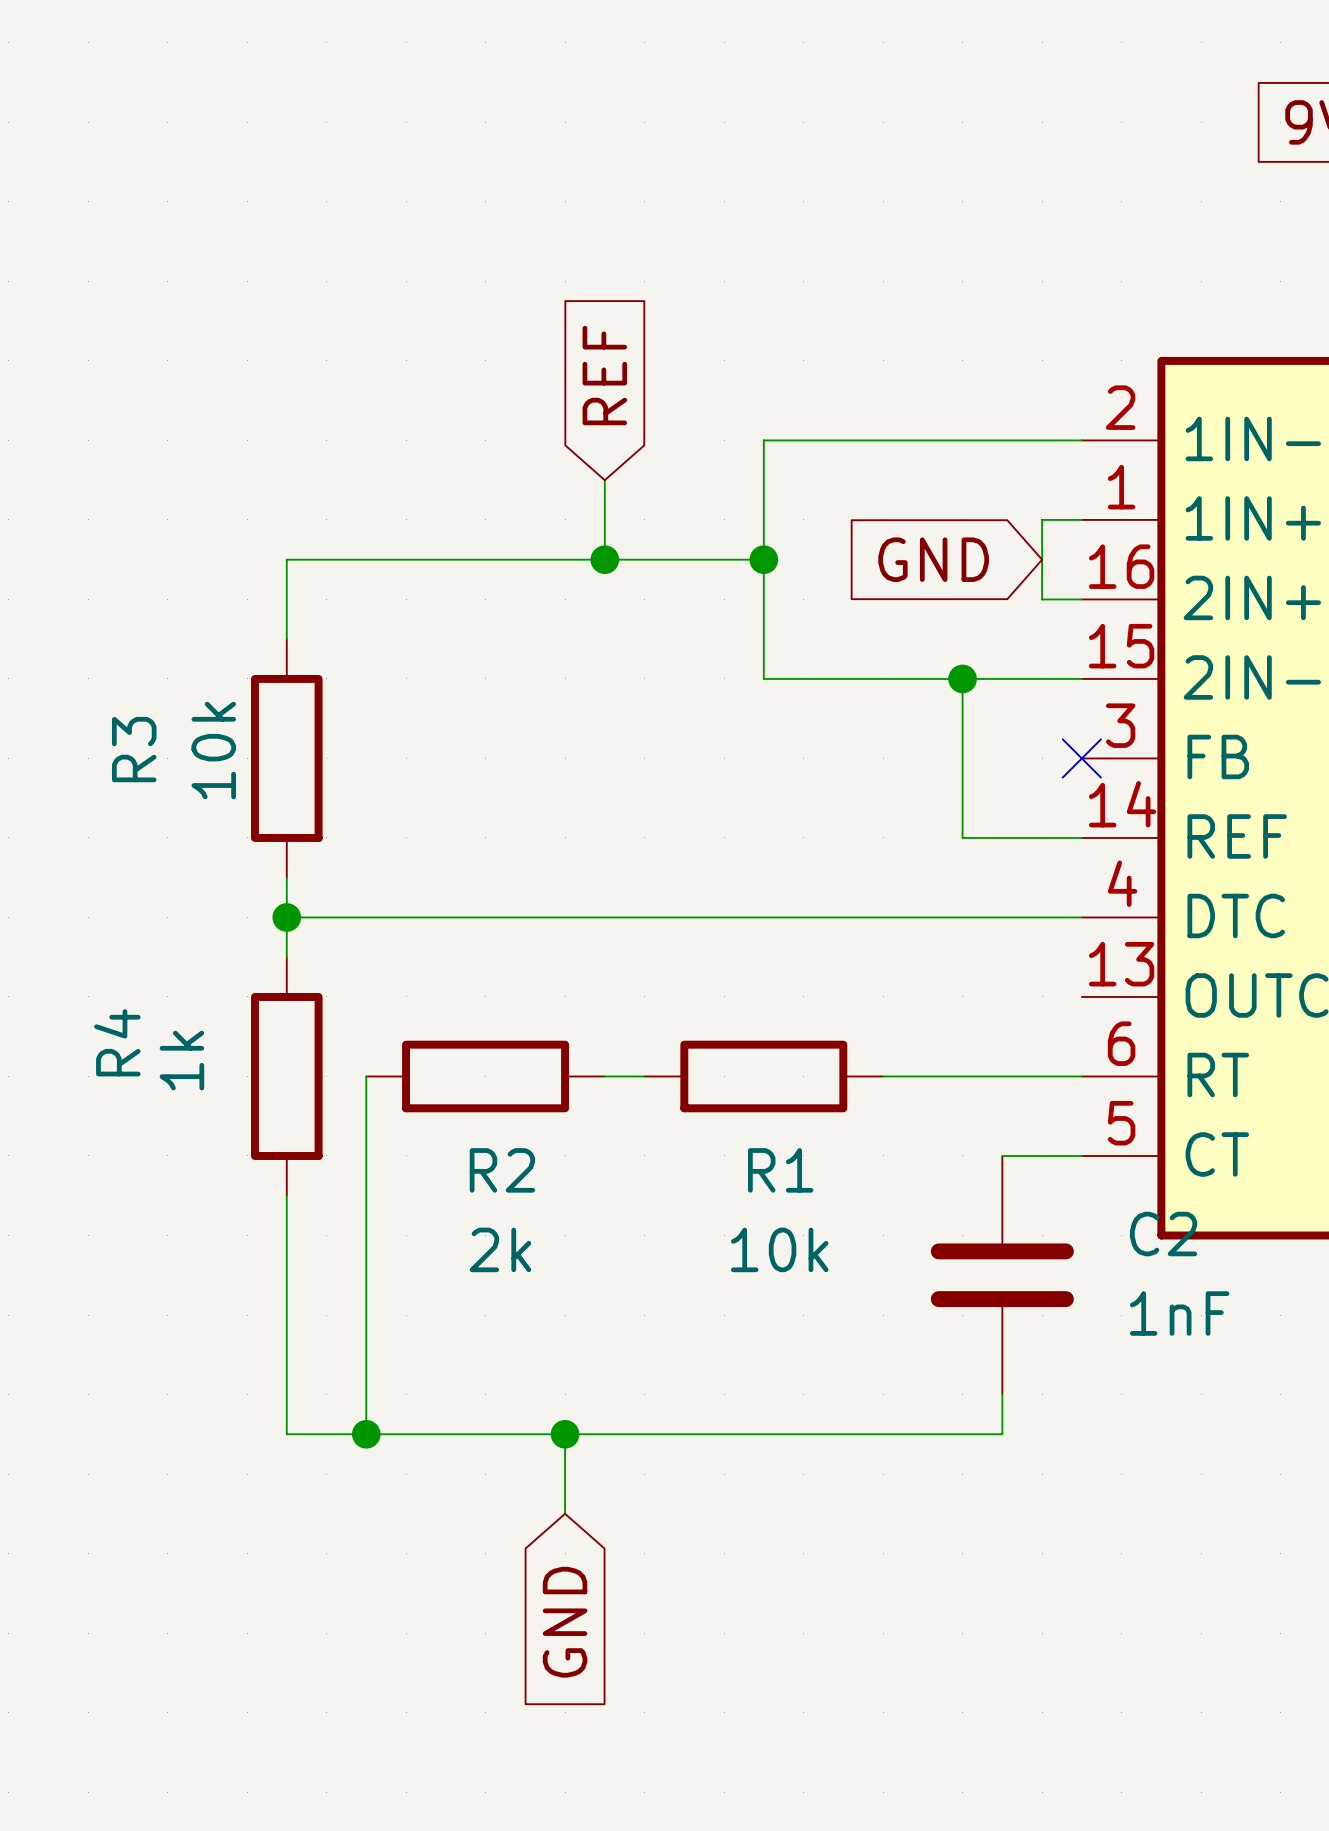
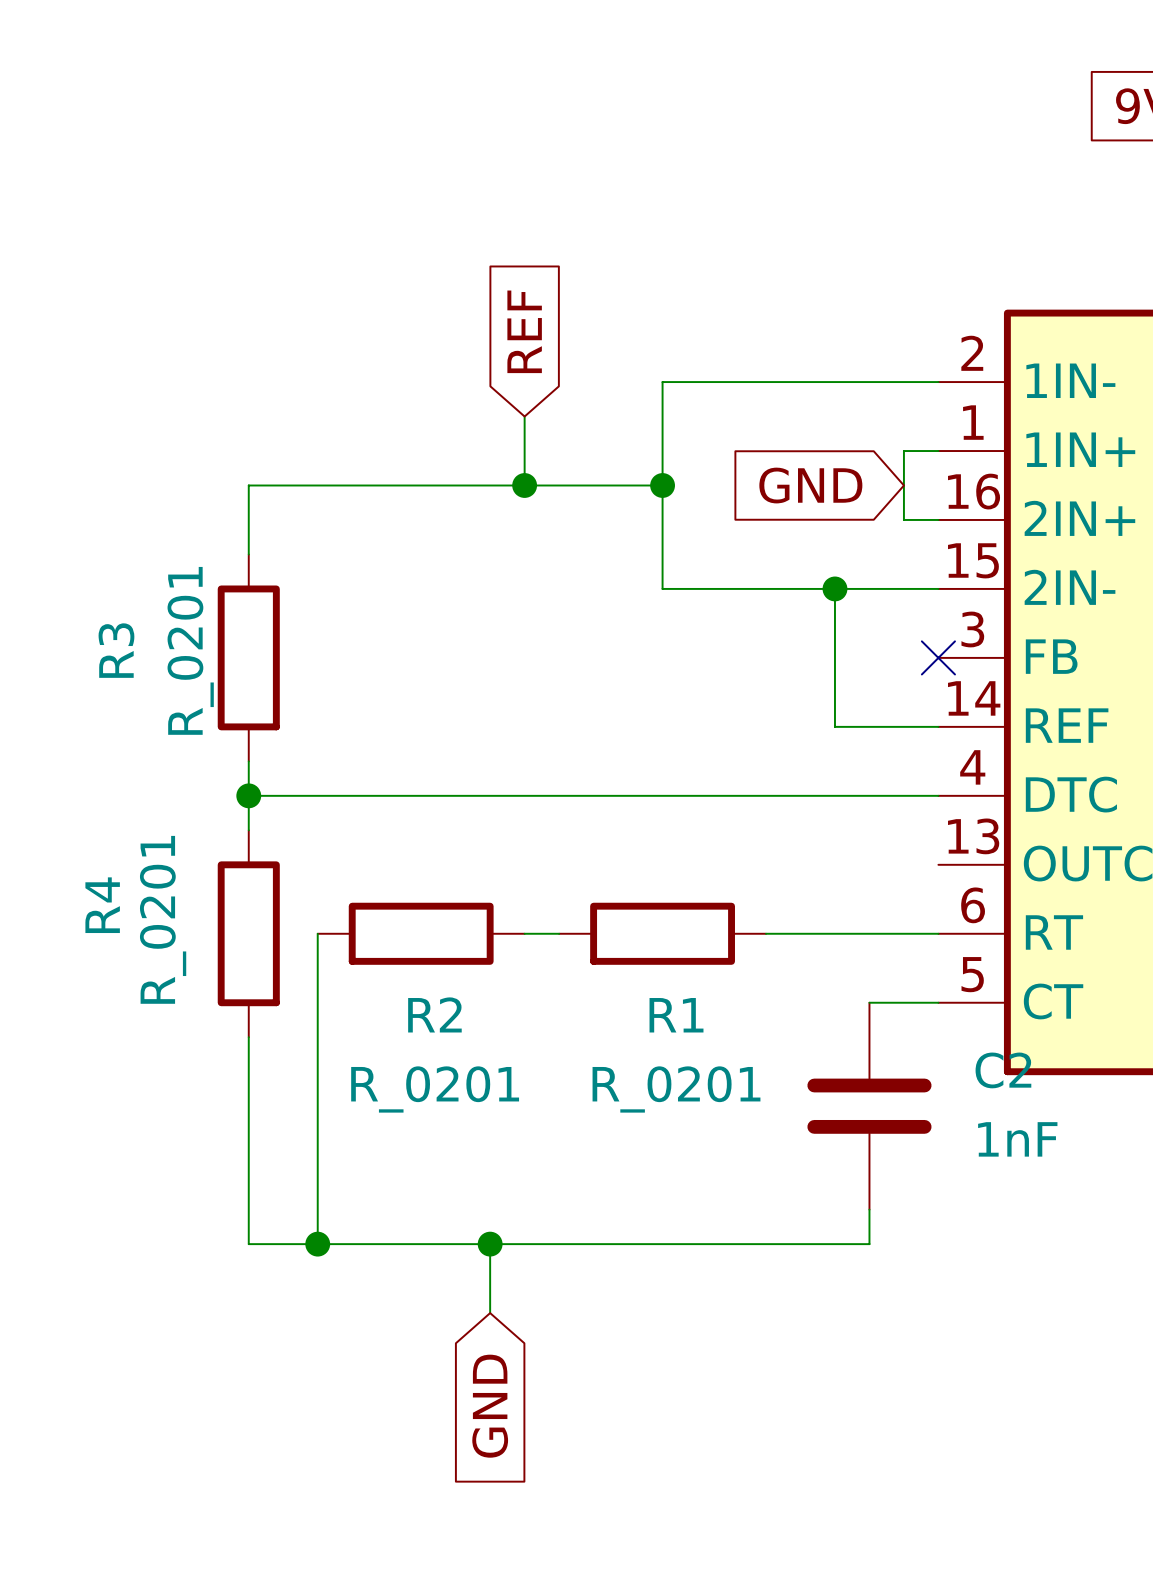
R3 value: 10k (213, 750) -> R_0201 (190, 650)
R4 value: 1k (181, 1060) -> R_0201 (163, 919)
R2 value: 2k (500, 1249) -> R_0201 (435, 1089)
R1 value: 10k (779, 1249) -> R_0201 (676, 1089)

